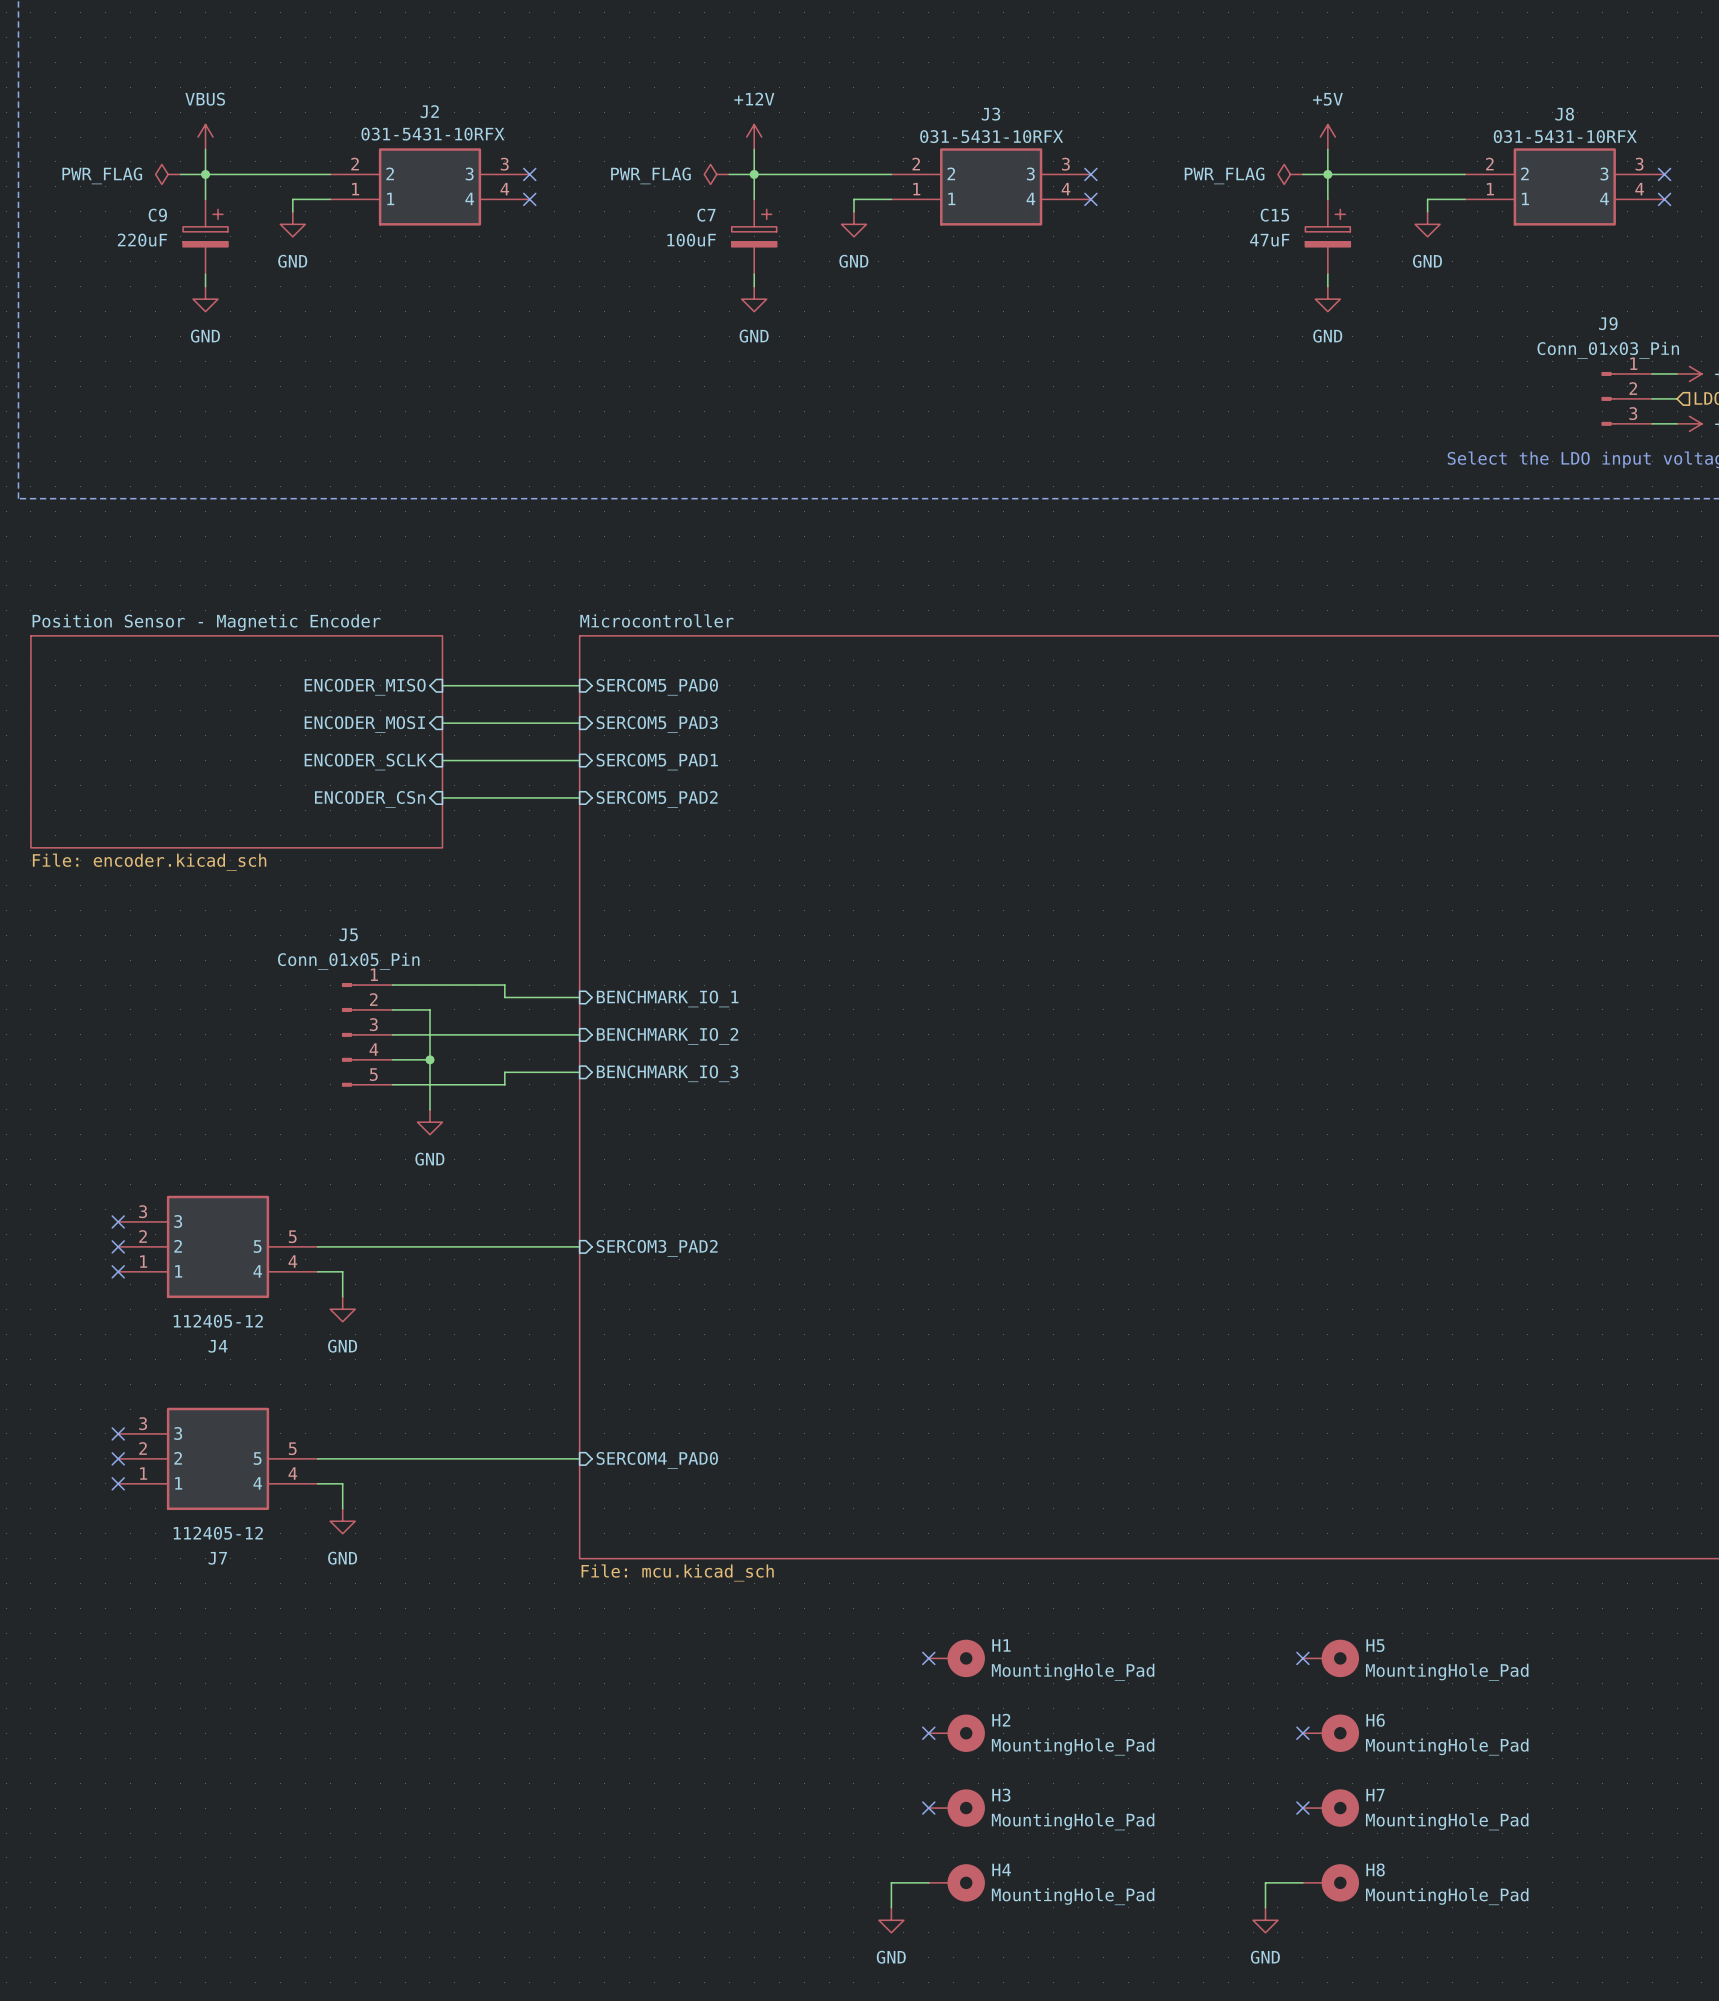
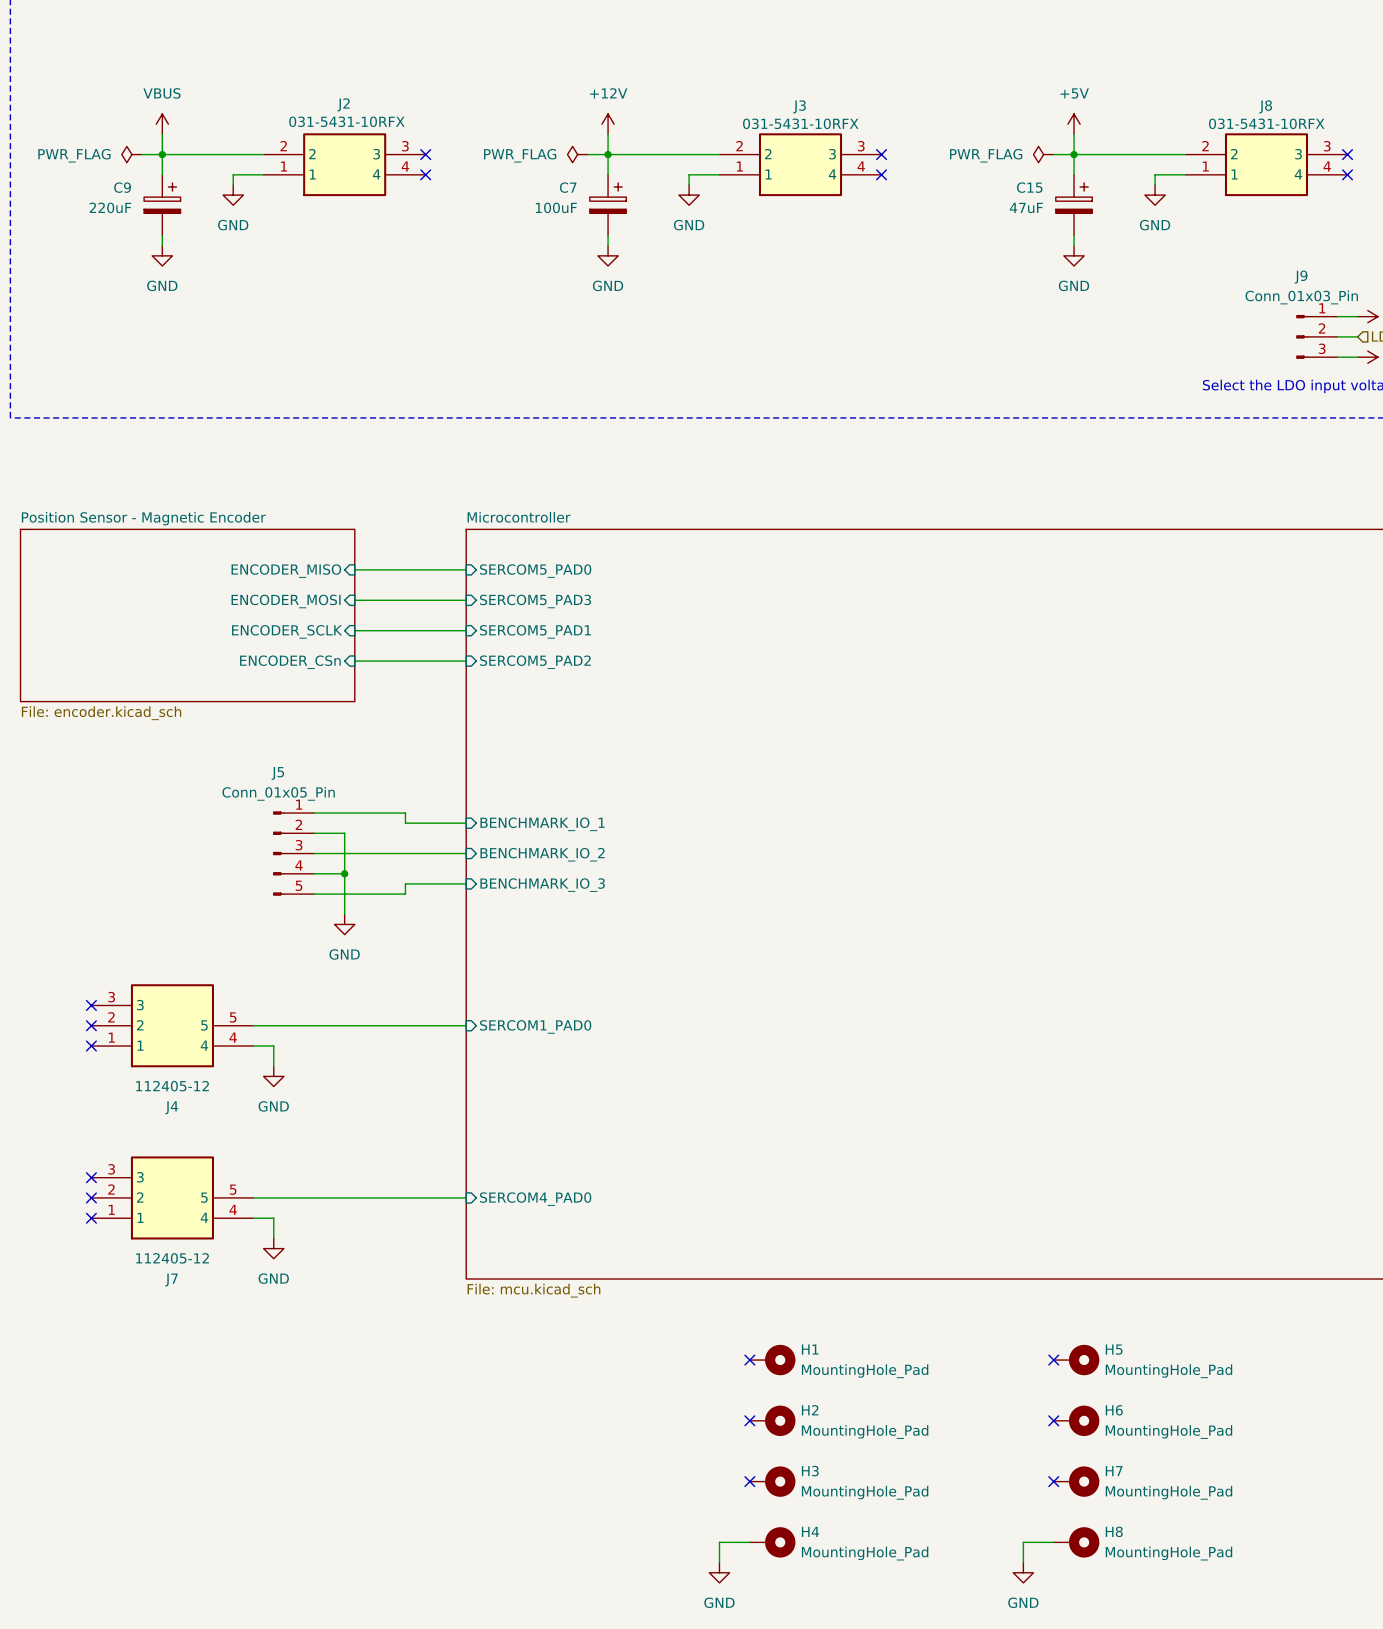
sheet pin: SERCOM3_PAD2 (657, 1248) -> SERCOM1_PAD0 (535, 1026)

